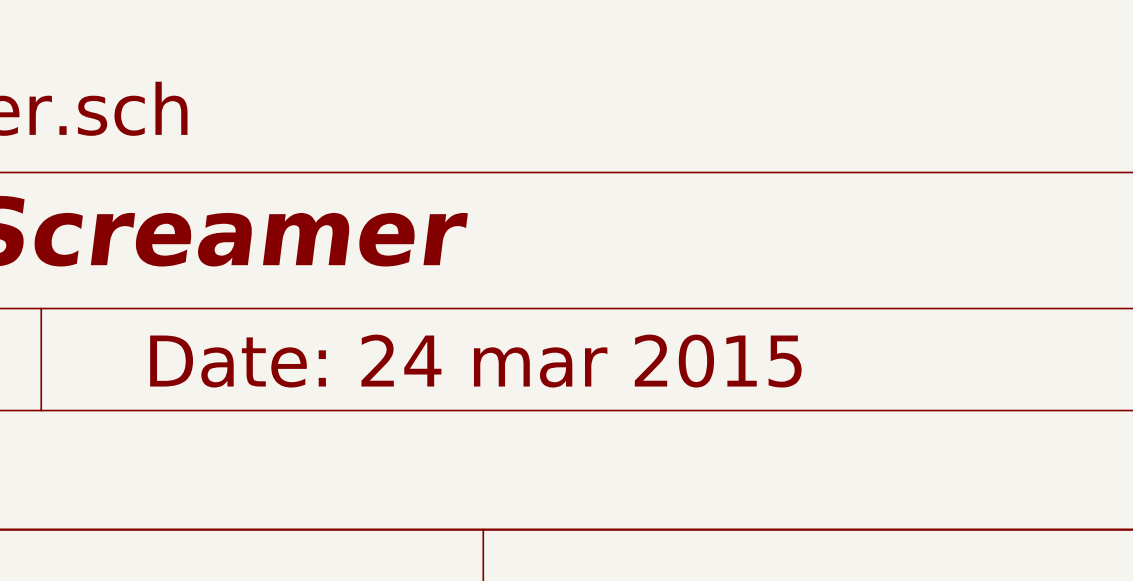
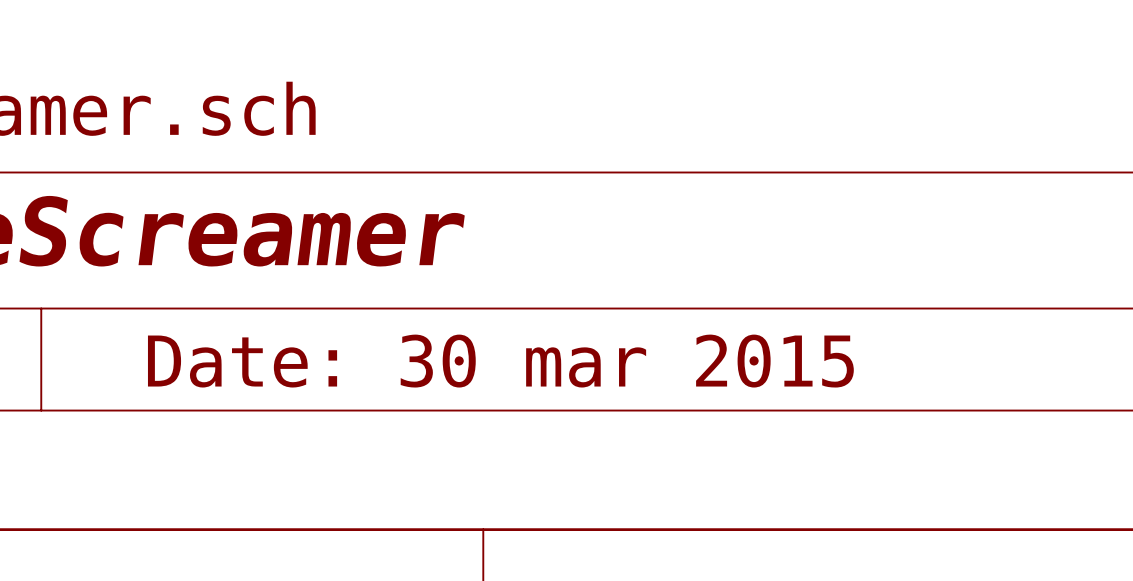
title block: Date: 24 mar 2015 (475, 361) -> Date: 30 mar 2015 (500, 361)

